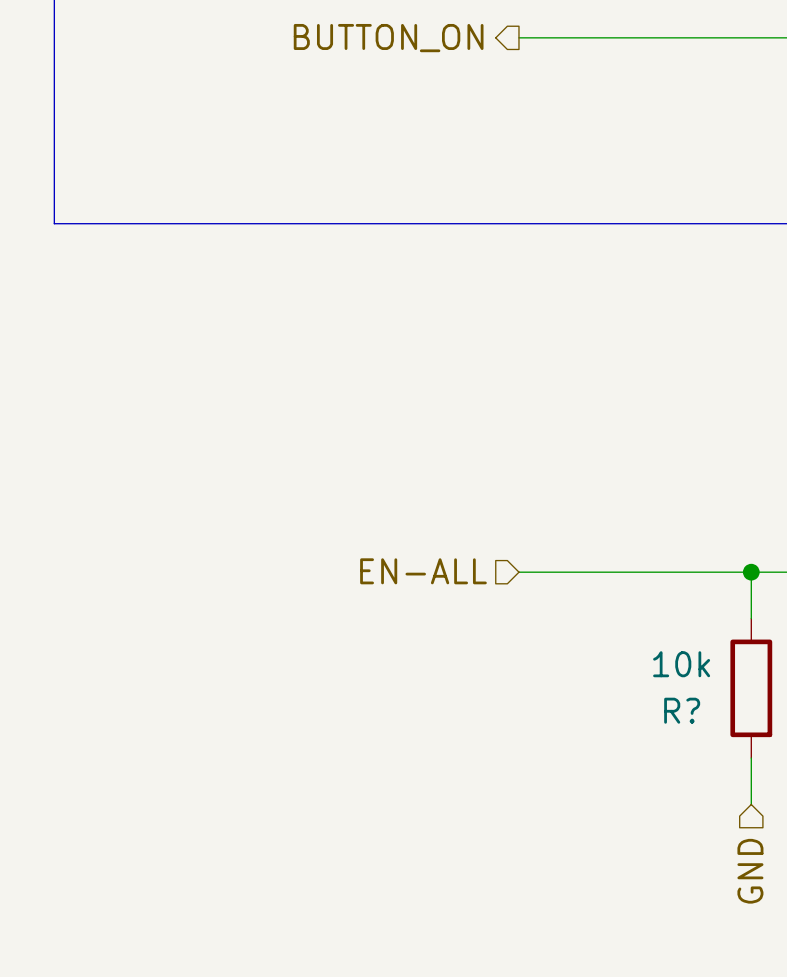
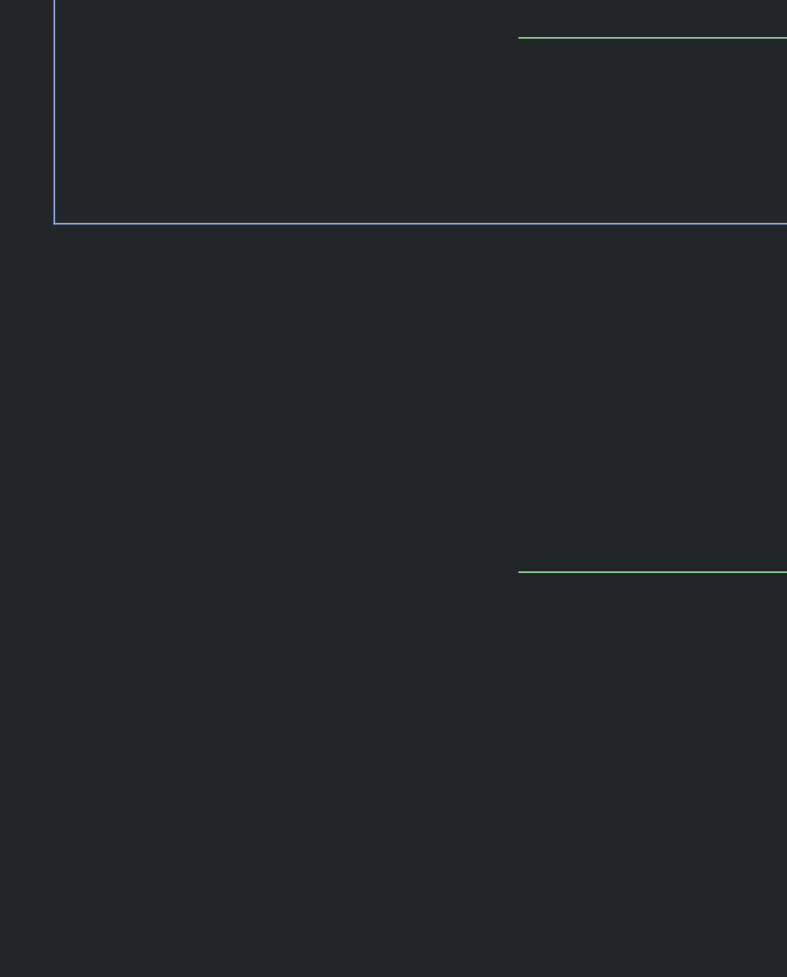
hierarchical label: BUTTON_ON (388, 38) -> none
hierarchical label: EN-ALL (423, 571) -> none
wire: (751, 572) (751, 618) -> none
junction: (751, 572) -> none
R?: 10k (751, 688) -> none
wire: (751, 758) (751, 804) -> none
hierarchical label: GND (750, 871) -> none

